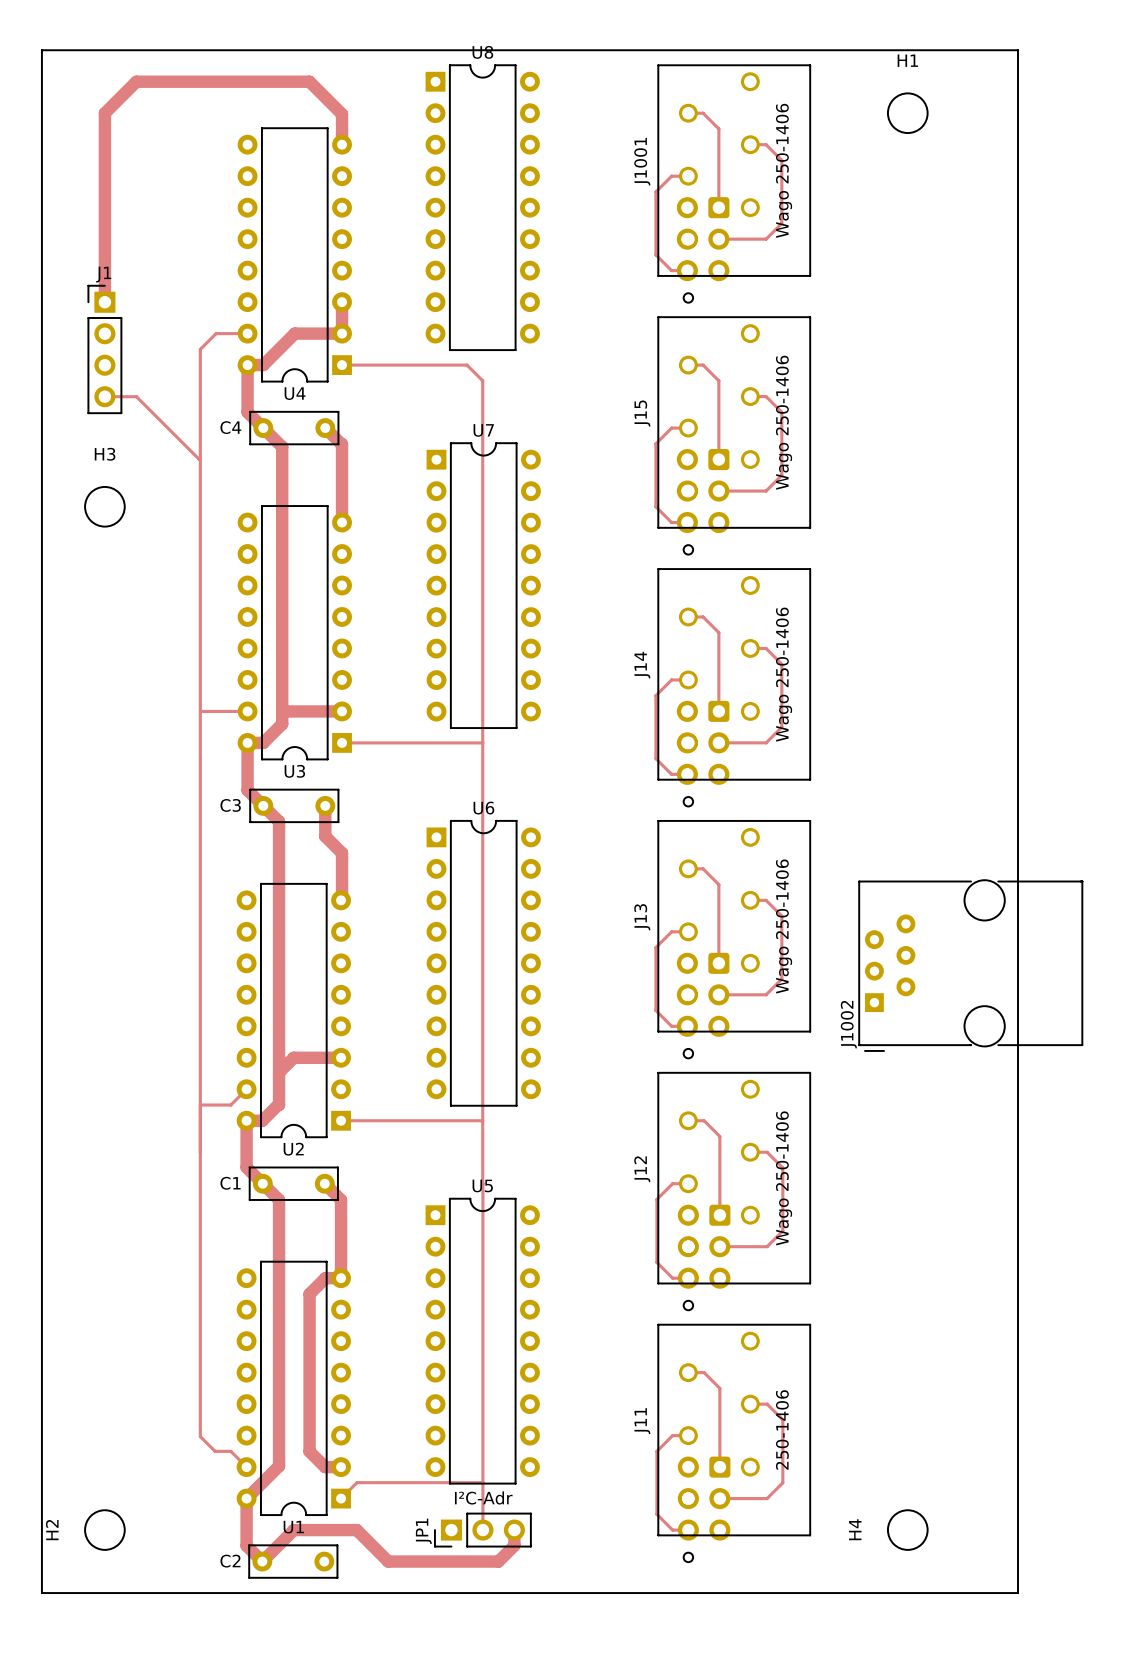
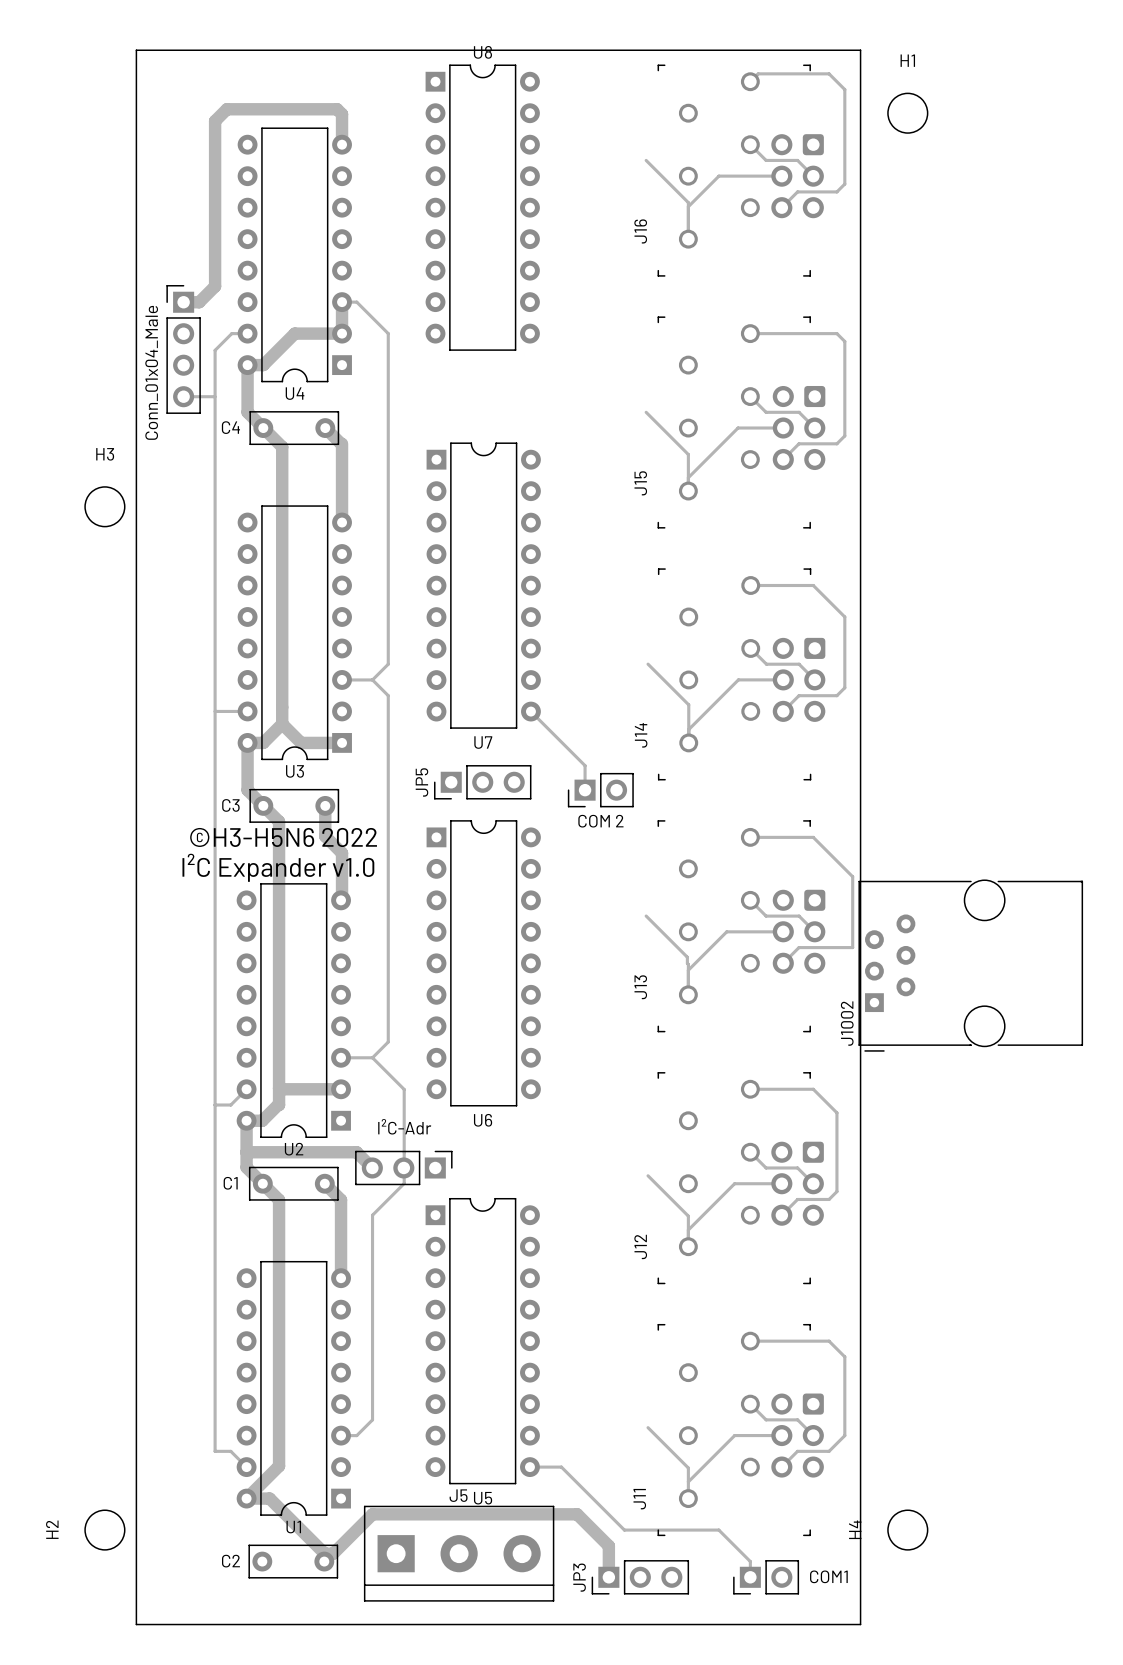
board edge: (136, 50) (41, 50) (41, 1593) (1017, 1593) (1017, 50) (860, 50) -> (136, 50) (136, 1624) (860, 1624) (860, 50)
track: none -> (750, 81) (758, 73) (829, 73) (844, 89) (844, 184) (836, 191) (797, 191) (781, 207)
track: (337, 109) (309, 81) (136, 81) (104, 113) (104, 302) -> (337, 109) (226, 109) (215, 121) (215, 286) (199, 302) (183, 302)
track: (688, 113) (703, 113) (718, 128) (718, 207) -> none
track: (750, 144) (766, 144) (781, 160) (781, 223) (766, 239) (718, 239) -> (750, 144) (766, 160) (797, 160) (813, 176)
track: none -> (646, 160) (688, 202) (688, 239)
J16: none -> (734, 170)
track: (688, 176) (671, 176) (655, 191) (655, 254) (671, 270) (687, 270) -> none
track: none -> (781, 176) (718, 176) (688, 206)
part: none -> (797, 176)
J1001: Wago 250-1406 (734, 183) -> none
part: (703, 239) -> none
track: none -> (342, 302) (356, 302) (388, 333) (388, 664) (372, 679)
J15 footprint: [657, 316, 811, 556] -> [657, 316, 811, 529]
track: (231, 333) (216, 333) (200, 349) (200, 1436) (215, 1451) -> (231, 333) (215, 350) (215, 1451)
track: none -> (750, 333) (836, 333) (844, 341) (844, 435) (836, 443) (798, 443) (783, 459)
J1: (104, 349) -> none
part: none -> Conn_01x04_Male (183, 349)
track: (342, 365) (466, 365) (482, 380) (482, 1530) -> none
track: (688, 365) (703, 365) (718, 380) (718, 459) -> none
track: (104, 396) (136, 396) (200, 458) -> none
track: none -> (183, 396) (214, 396)
track: (750, 396) (766, 396) (781, 412) (781, 475) (766, 491) (718, 491) -> (750, 396) (766, 412) (799, 412) (814, 428)
track: none -> (646, 412) (688, 454) (688, 491)
J15 name position: J15 (642, 413) -> J15 (640, 483)
J15 value: Wago 250-1406 (784, 422) -> none
track: (688, 428) (671, 428) (655, 443) (655, 506) (671, 522) (687, 522) -> none
track: none -> (783, 428) (738, 428) (688, 477)
part: none -> (799, 428)
U7 name position: U7 (483, 430) -> U7 (483, 742)
part: (703, 491) -> none
J14 footprint: [657, 568, 811, 808] -> [657, 568, 812, 781]
track: none -> (750, 585) (813, 585) (844, 616) (844, 687) (836, 695) (798, 695) (783, 711)
track: (688, 616) (703, 616) (718, 632) (718, 711) -> none
track: (750, 648) (766, 648) (781, 664) (781, 727) (766, 742) (718, 742) -> (750, 648) (766, 664) (799, 664) (814, 679)
track: none -> (648, 664) (688, 704) (688, 742)
J14 name position: J14 (642, 665) -> J14 (641, 735)
J14 value: Wago 250-1406 (784, 674) -> none
track: none -> (342, 679) (372, 679)
track: none -> (372, 679) (388, 695) (388, 1042) (372, 1057)
track: (688, 679) (671, 679) (655, 695) (655, 758) (671, 774) (687, 774) -> none
track: none -> (783, 679) (738, 679) (688, 729)
part: none -> (799, 679)
track: (282, 707) (286, 711) (342, 711) -> none
track: (200, 711) (215, 711) -> none
track: none -> (530, 711) (585, 765) (585, 790)
track: (342, 742) (482, 742) -> (342, 742) (301, 742) (282, 724)
part: (703, 742) -> none
JP5: none -> (482, 782)
part: none -> COM 2 (600, 790)
U6 name position: U6 (483, 808) -> U6 (483, 1120)
J13 footprint: [657, 820, 811, 1060] -> [657, 820, 811, 1033]
text: none -> ©H3-H5N6 2022 (283, 837)
track: none -> (750, 837) (813, 837) (852, 876) (852, 947) (798, 947) (783, 963)
track: (688, 868) (703, 868) (718, 884) (718, 963) -> none
text: none -> I²C Expander v1.0 (278, 867)
track: (750, 900) (766, 900) (781, 916) (781, 979) (766, 994) (718, 994) -> (750, 900) (766, 916) (799, 916) (814, 931)
track: none -> (646, 916) (687, 957) (688, 994)
J13 name position: J13 (642, 917) -> J13 (640, 987)
J13 value: Wago 250-1406 (784, 926) -> none
track: (688, 931) (671, 931) (655, 947) (655, 1010) (671, 1026) (687, 1026) -> none
track: none -> (783, 931) (726, 931) (688, 970)
part: none -> (799, 931)
part: (703, 994) -> none
track: (341, 1057) (293, 1057) (279, 1072) -> (341, 1057) (372, 1057)
track: none -> (372, 1057) (404, 1089) (404, 1183) (372, 1215) (372, 1419) (356, 1435) (341, 1435)
J12 footprint: [657, 1072, 811, 1311] -> [657, 1072, 811, 1285]
track: none -> (279, 1088) (341, 1089)
track: none -> (750, 1089) (813, 1089) (836, 1112) (836, 1191) (829, 1199) (797, 1199) (781, 1215)
track: (200, 1105) (215, 1105) -> none
track: (341, 1120) (482, 1120) -> none
track: (688, 1120) (704, 1120) (719, 1136) (719, 1215) -> none
track: none -> (246, 1152) (356, 1152) (372, 1167)
track: (750, 1152) (767, 1152) (782, 1167) (782, 1230) (767, 1246) (719, 1246) -> (750, 1152) (766, 1167) (797, 1167) (813, 1183)
part: none -> I²C-Adr (403, 1167)
J12 name position: J12 (642, 1169) -> J12 (640, 1246)
track: none -> (648, 1175) (688, 1216) (688, 1246)
J12 value: Wago 250-1406 (784, 1178) -> none
track: (688, 1183) (672, 1183) (656, 1199) (656, 1262) (672, 1278) (688, 1278) -> none
track: none -> (781, 1183) (734, 1183) (688, 1229)
part: none -> (797, 1183)
U5 name position: U5 (482, 1185) -> U5 (483, 1498)
part: (704, 1246) -> none
track: (341, 1278) (325, 1278) (309, 1294) (309, 1451) (325, 1467) (341, 1467) -> none
J11 footprint: [657, 1323, 811, 1563] -> [657, 1323, 811, 1537]
track: none -> (750, 1341) (829, 1341) (844, 1356) (844, 1435) (829, 1451) (797, 1451) (781, 1467)
track: (688, 1372) (704, 1372) (719, 1388) (719, 1467) -> none
track: (750, 1404) (767, 1404) (782, 1419) (782, 1482) (767, 1498) (719, 1498) -> (750, 1404) (766, 1419) (797, 1419) (813, 1435)
J11 name position: J11 (642, 1421) -> J11 (639, 1499)
track: none -> (648, 1427) (688, 1468) (688, 1498)
J11 value: 250-1406 (782, 1429) -> none
track: (688, 1435) (672, 1435) (656, 1451) (656, 1514) (672, 1530) -> (529, 1467) (561, 1467) (624, 1530) (672, 1530)
track: none -> (781, 1435) (734, 1435) (688, 1481)
part: none -> (797, 1435)
track: (482, 1482) (356, 1482) (341, 1498) -> none
track: (246, 1498) (246, 1545) (262, 1561) (293, 1530) (356, 1530) (388, 1561) (498, 1561) (514, 1545) (514, 1530) -> (246, 1498) (269, 1498) (324, 1553) (333, 1553) (372, 1514) (577, 1514) (608, 1546) (608, 1577)
part: (704, 1498) -> none
JP1: I²C-Adr (482, 1530) -> none
track: none -> (688, 1530) (718, 1530) (750, 1561) (750, 1577)
J5: none -> (459, 1553)
JP3: none -> (640, 1577)
part: none -> COM1 (766, 1577)

